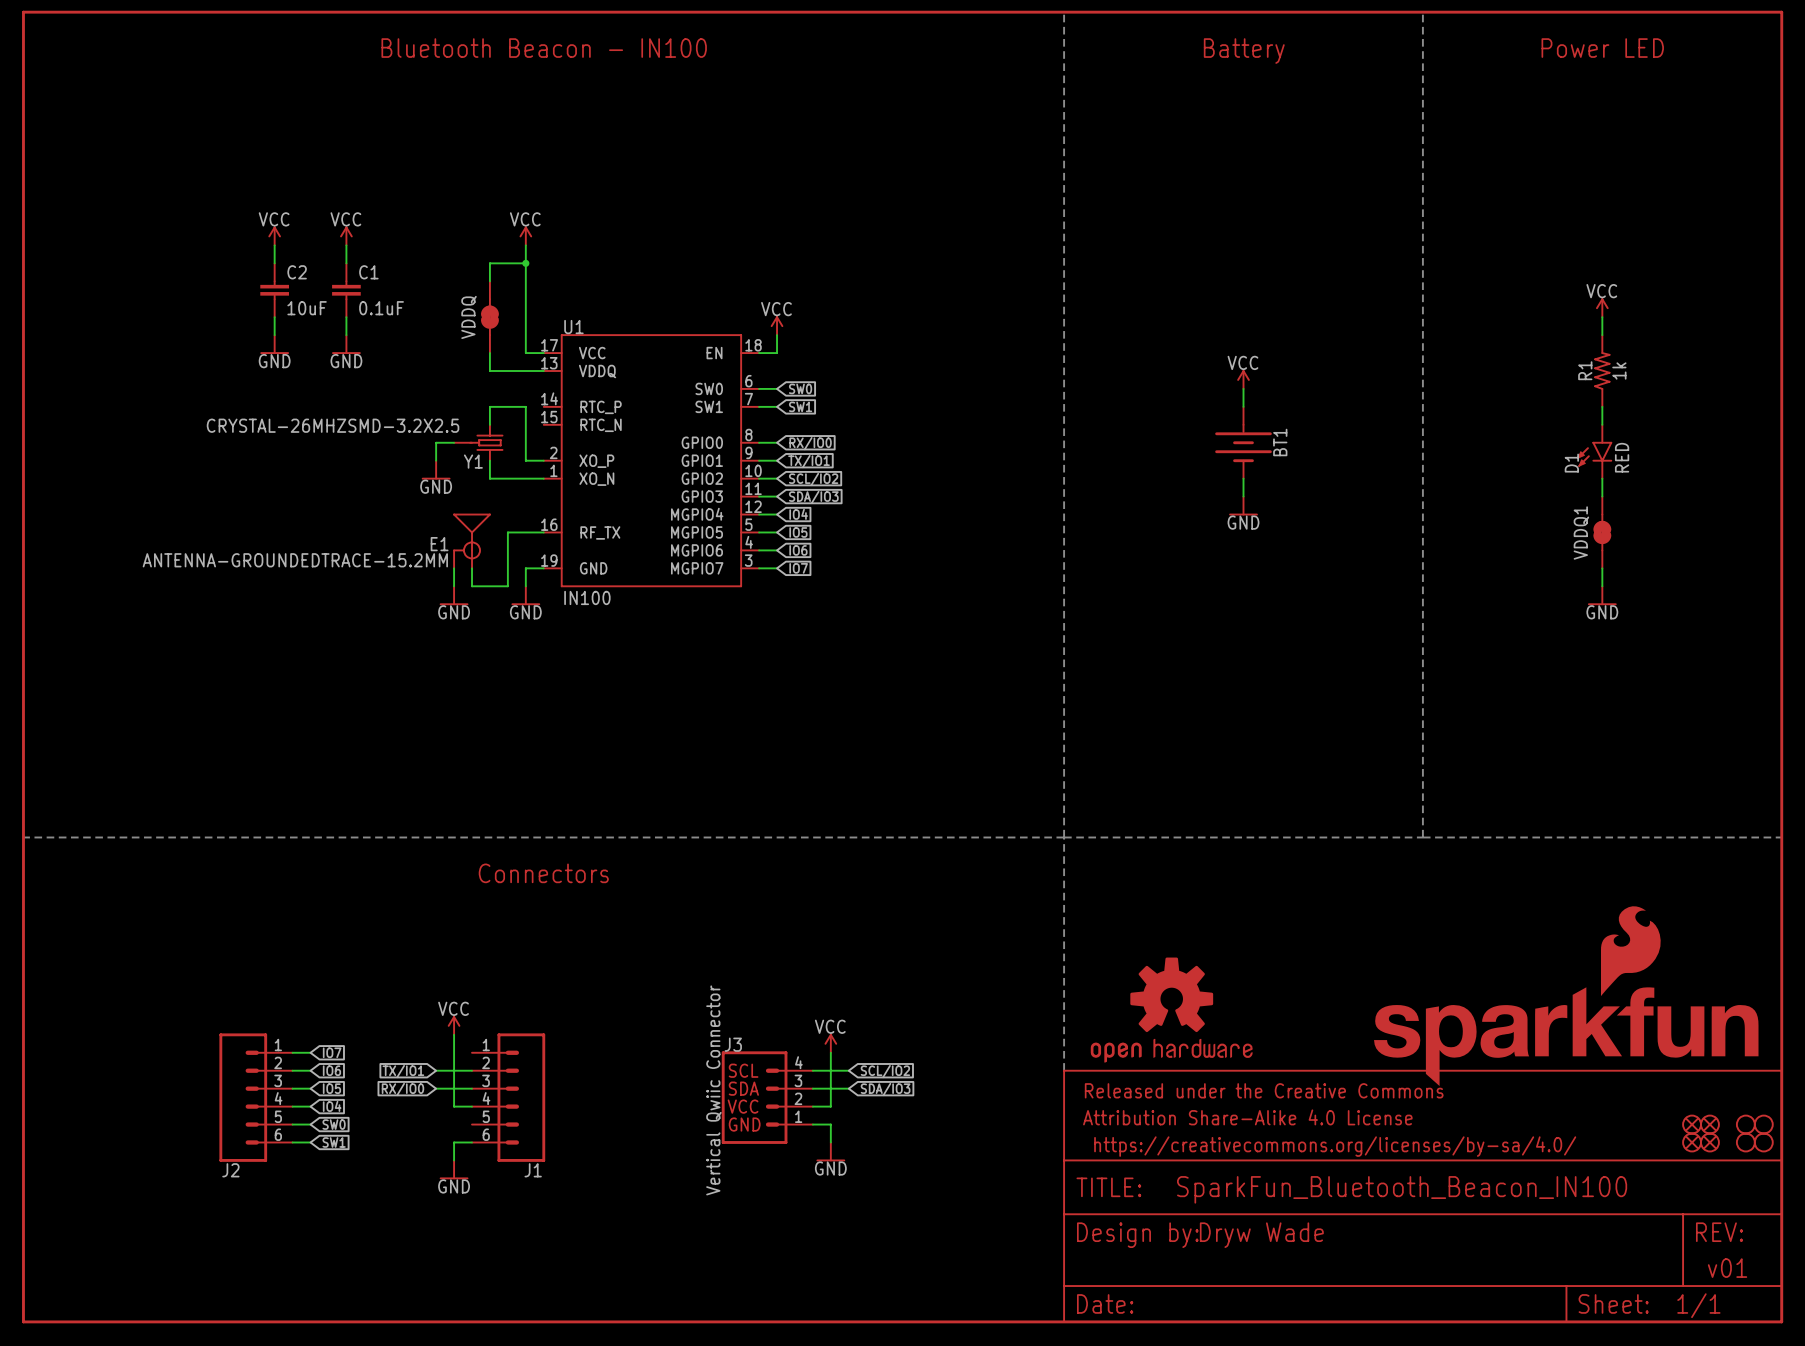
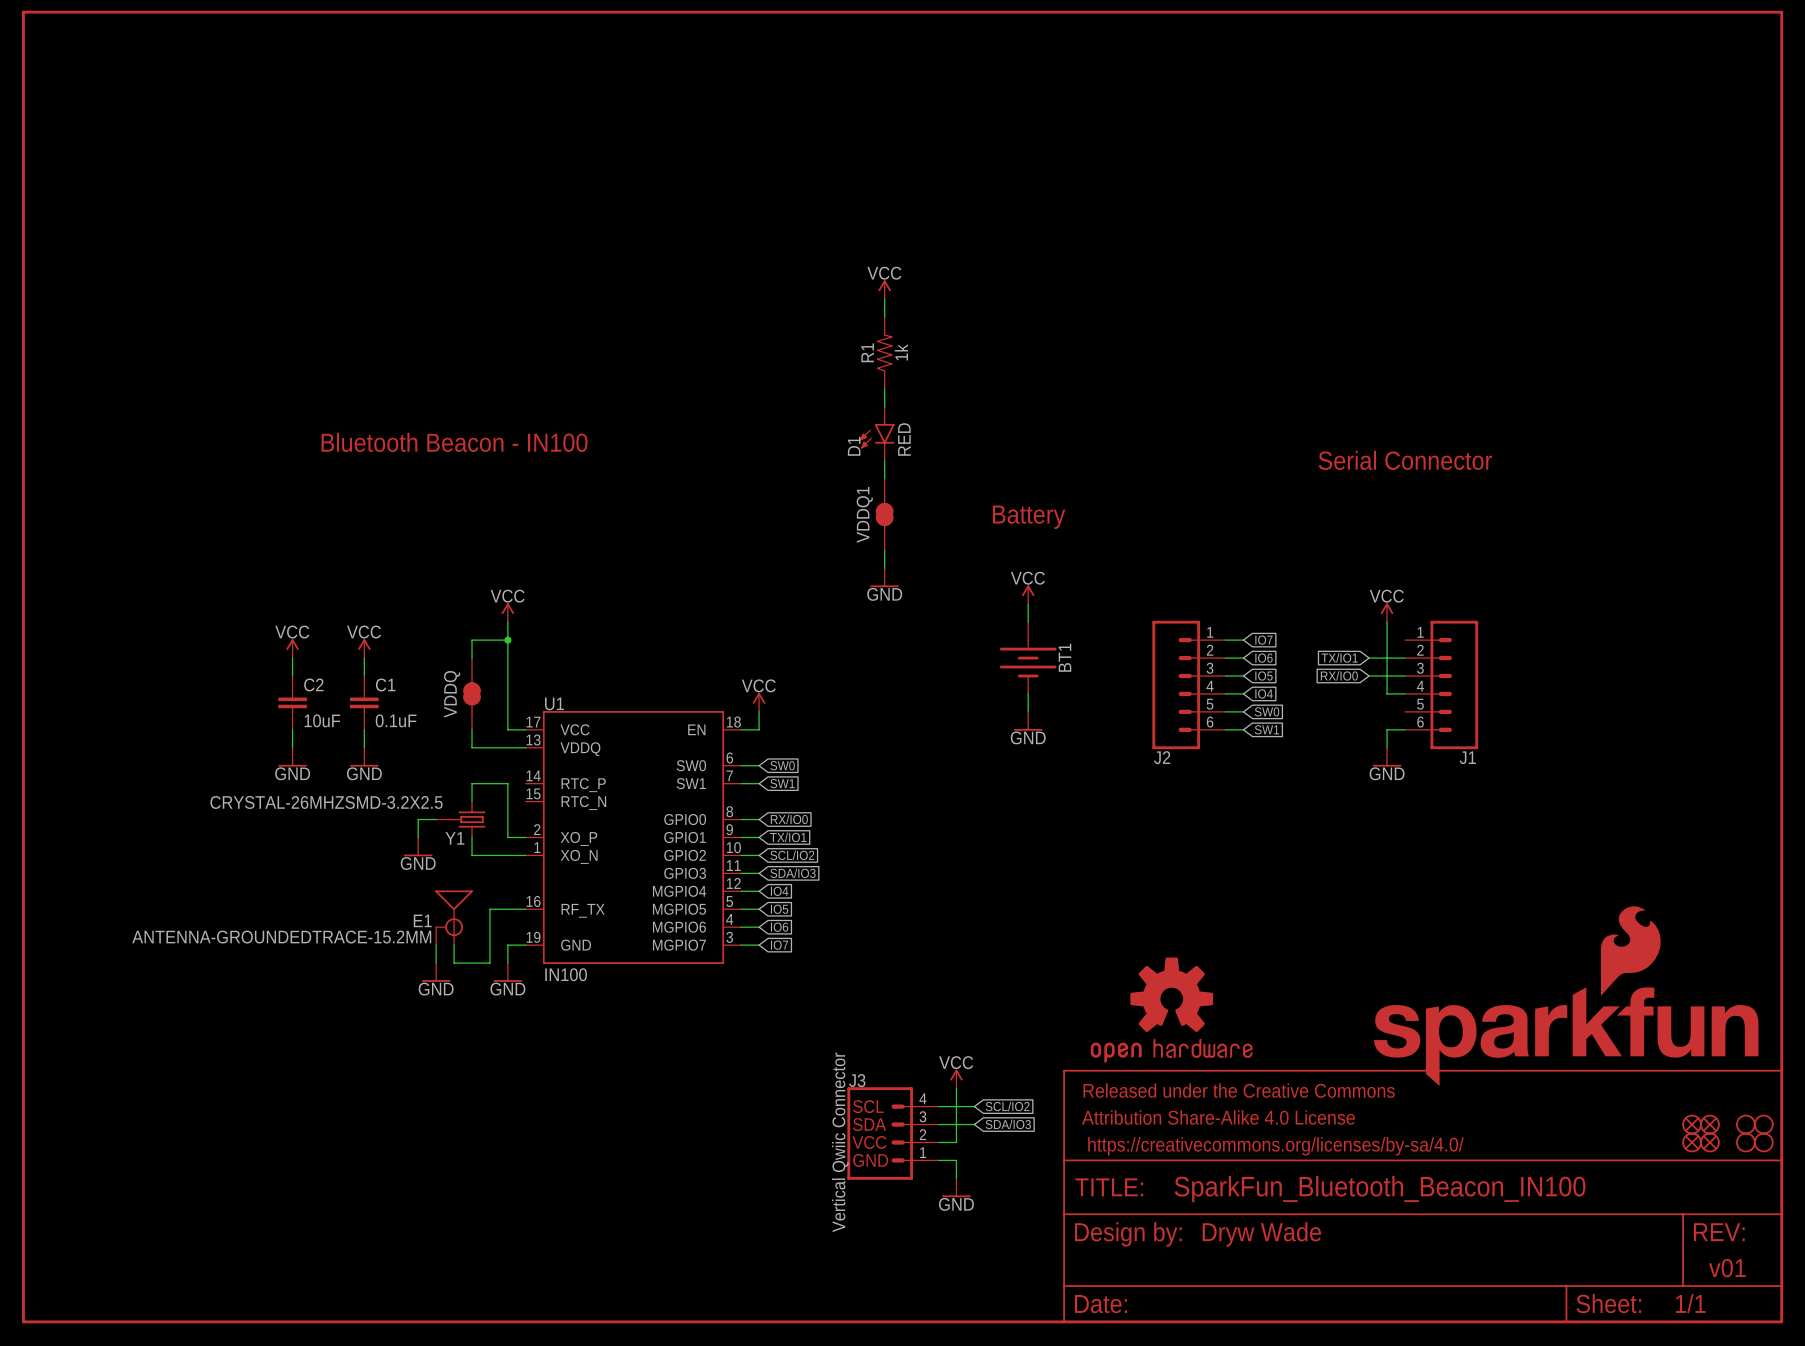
line: (1064, 12) (1064, 1070) -> none
line: (1422, 12) (1422, 837) -> none
text: Bluetooth Beacon - IN100 (544, 48) -> none
text: Power LED (1602, 48) -> none
text: Battery (1244, 51) -> none
power symbol: VCC (274, 235) -> none
power symbol: VCC (346, 235) -> none
power symbol: VCC (525, 235) -> none
wire: (274, 245) (274, 263) -> none
wire: (346, 245) (346, 263) -> none
wire: (525, 245) (525, 353) (543, 353) -> none
wire: (525, 263) (489, 263) (489, 281) -> none
junction: (525, 263) -> none
C2 position: (274, 290) -> (292, 702)
C1 position: (346, 290) -> (364, 702)
wire: none -> (884, 299) (884, 317)
power symbol: VCC (1602, 307) -> none
wire: (274, 317) (274, 335) -> none
wire: (346, 317) (346, 335) -> none
VDDQ: (489, 317) -> none
wire: (1602, 317) (1602, 335) -> none
power symbol position: VCC (777, 325) -> VCC (884, 289)
wire: (777, 335) (777, 353) (759, 353) -> none
power symbol: GND (274, 344) -> none
power symbol: GND (346, 344) -> none
wire: (489, 353) (489, 370) (543, 370) -> none
R1 position: (1602, 370) -> (884, 353)
power symbol: VCC (1243, 379) -> none
wire: (759, 388) (777, 388) -> none
global label: SW0 (800, 388) -> none
wire: none -> (884, 388) (884, 406)
wire: (1243, 388) (1243, 406) -> none
wire: (759, 406) (777, 406) -> none
global label: SW1 (800, 406) -> none
wire: (1602, 406) (1602, 424) -> none
wire: (489, 424) (489, 406) (525, 406) (525, 460) (543, 460) -> none
wire: (454, 442) (436, 442) (436, 460) -> none
text: none -> Bluetooth Beacon - IN100 (454, 442)
Y1 position: (478, 442) -> (460, 819)
wire: (759, 442) (777, 442) -> none
BT1 position: (1243, 442) -> (1028, 658)
global label: RX/IO0 (810, 443) -> none
D1 position: (1594, 451) -> (877, 433)
wire: (489, 460) (489, 478) (543, 478) -> none
U1 position: (651, 460) -> (633, 837)
wire: (759, 460) (777, 460) -> none
wire: none -> (884, 460) (884, 478)
text: none -> Serial Connector (1405, 460)
global label: TX/IO1 (809, 461) -> none
power symbol: GND (436, 470) -> none
wire: (759, 478) (777, 478) -> none
wire: (1243, 478) (1243, 496) -> none
wire: (1602, 478) (1602, 496) -> none
global label: SCL/IO2 (813, 479) -> none
wire: (759, 496) (777, 496) -> none
global label: SDA/IO3 (813, 497) -> none
power symbol: GND (1243, 506) -> none
wire: (759, 514) (777, 514) -> none
global label: IO4 (798, 514) -> none
text: none -> Battery (1029, 517)
wire: (543, 532) (507, 532) (507, 586) (472, 586) (472, 568) -> none
wire: (759, 532) (777, 532) -> none
global label: IO5 (798, 532) -> none
VDDQ1 position: (1602, 532) -> (884, 514)
E1 position: (472, 540) -> (454, 917)
wire: (759, 550) (777, 550) -> none
global label: IO6 (798, 550) -> none
wire: none -> (884, 550) (884, 568)
wire: (454, 568) (454, 586) -> (364, 658) (364, 676)
wire: (543, 568) (525, 568) (525, 586) -> none
wire: (759, 568) (777, 568) -> none
global label: IO7 (798, 568) -> none
wire: (1602, 568) (1602, 586) -> none
power symbol: none -> GND (884, 577)
power symbol: none -> VCC (1028, 594)
power symbol: GND (454, 595) -> none
power symbol: GND (525, 595) -> none
power symbol: GND (1602, 595) -> none
wire: none -> (1028, 604) (1028, 622)
power symbol: none -> VCC (507, 612)
power symbol: none -> VCC (1387, 612)
wire: none -> (507, 622) (507, 729) (525, 729)
wire: none -> (1387, 622) (1387, 693) (1404, 693)
wire: none -> (507, 640) (472, 640) (472, 658)
junction: none -> (507, 640)
wire: none -> (1225, 640) (1243, 640)
global label: none -> IO7 (1263, 640)
power symbol: none -> VCC (292, 648)
power symbol: none -> VCC (364, 648)
wire: none -> (292, 658) (292, 676)
wire: none -> (1225, 658) (1243, 658)
global label: none -> IO6 (1264, 658)
global label: none -> TX/IO1 (1339, 657)
wire: none -> (1369, 658) (1404, 658)
wire: none -> (1225, 676) (1243, 676)
global label: none -> IO5 (1264, 676)
global label: none -> RX/IO0 (1339, 675)
wire: none -> (1369, 676) (1404, 676)
VDDQ: none -> (472, 693)
wire: none -> (1028, 693) (1028, 711)
wire: none -> (1225, 693) (1243, 693)
global label: none -> IO4 (1264, 693)
power symbol: none -> VCC (759, 702)
wire: none -> (759, 711) (759, 729) (741, 729)
wire: none -> (1225, 711) (1243, 711)
global label: none -> SW0 (1267, 711)
power symbol: none -> GND (1028, 721)
wire: none -> (292, 729) (292, 747)
wire: none -> (364, 729) (364, 747)
wire: none -> (472, 729) (472, 747) (525, 747)
wire: none -> (1225, 729) (1243, 729)
global label: none -> SW1 (1266, 729)
wire: none -> (1404, 729) (1387, 729) (1387, 747)
power symbol: none -> GND (292, 757)
power symbol: none -> GND (364, 757)
power symbol: none -> GND (1387, 757)
wire: none -> (741, 765) (759, 765)
global label: none -> SW0 (782, 765)
wire: none -> (741, 783) (759, 783)
global label: none -> SW1 (782, 783)
wire: none -> (472, 801) (472, 783) (507, 783) (507, 837) (525, 837)
wire: none -> (436, 819) (418, 819) (418, 837)
wire: none -> (741, 819) (759, 819)
global label: none -> RX/IO0 (789, 819)
line: (23, 837) (1781, 837) -> none
wire: none -> (472, 837) (472, 855) (525, 855)
global label: none -> TX/IO1 (788, 837)
power symbol: none -> GND (418, 846)
wire: none -> (741, 855) (759, 855)
global label: none -> SCL/IO2 (792, 855)
text: Connectors (543, 873) -> none
wire: none -> (741, 873) (759, 873)
global label: none -> SDA/IO3 (793, 873)
wire: none -> (741, 891) (759, 891)
global label: none -> IO4 (779, 891)
wire: none -> (525, 909) (489, 909) (489, 963) (454, 963) (454, 945)
wire: none -> (741, 909) (759, 909)
global label: none -> IO5 (779, 909)
wire: none -> (741, 927) (759, 927)
global label: none -> IO6 (779, 927)
wire: none -> (436, 945) (436, 963)
wire: none -> (525, 945) (507, 945) (507, 963)
wire: none -> (741, 945) (759, 945)
global label: none -> IO7 (779, 945)
power symbol: none -> GND (436, 972)
power symbol: none -> GND (507, 972)
power symbol: VCC (454, 1025) -> none
wire: (454, 1034) (454, 1106) (472, 1106) -> none
power symbol position: VCC (830, 1043) -> VCC (956, 1079)
wire: (292, 1052) (310, 1052) -> none
global label: IO7 (332, 1052) -> none
wire: (830, 1052) (830, 1106) (812, 1106) -> (956, 1088) (956, 1142) (938, 1142)
wire: (292, 1070) (310, 1070) -> none
global label: IO6 (331, 1070) -> none
wire: (436, 1070) (472, 1070) -> none
wire: (812, 1070) (848, 1070) -> (938, 1106) (974, 1106)
global label: TX/IO1 (403, 1071) -> none
global label: SCL/IO2 (885, 1071) -> none
wire: (292, 1088) (310, 1088) -> none
global label: IO5 (331, 1088) -> none
wire: (436, 1088) (472, 1088) -> none
wire: (812, 1088) (848, 1088) -> (938, 1124) (974, 1124)
global label: RX/IO0 (402, 1089) -> none
global label: SDA/IO3 (885, 1089) -> none
J2 position: (255, 1097) -> (1188, 684)
J1 position: (508, 1097) -> (1441, 684)
J3 position: (767, 1097) -> (892, 1133)
wire: (292, 1106) (310, 1106) -> none
global label: IO4 (332, 1106) -> none
global label: none -> SCL/IO2 (1007, 1106)
wire: (292, 1124) (310, 1124) -> none
global label: SW0 (334, 1124) -> none
wire: (812, 1124) (830, 1124) (830, 1142) -> (938, 1160) (956, 1160) (956, 1178)
global label: none -> SDA/IO3 (1008, 1124)
wire: (292, 1142) (310, 1142) -> none
global label: SW1 (334, 1142) -> none
wire: (472, 1142) (454, 1142) (454, 1160) -> none
power symbol position: GND (830, 1151) -> GND (956, 1187)
power symbol: GND (454, 1169) -> none

